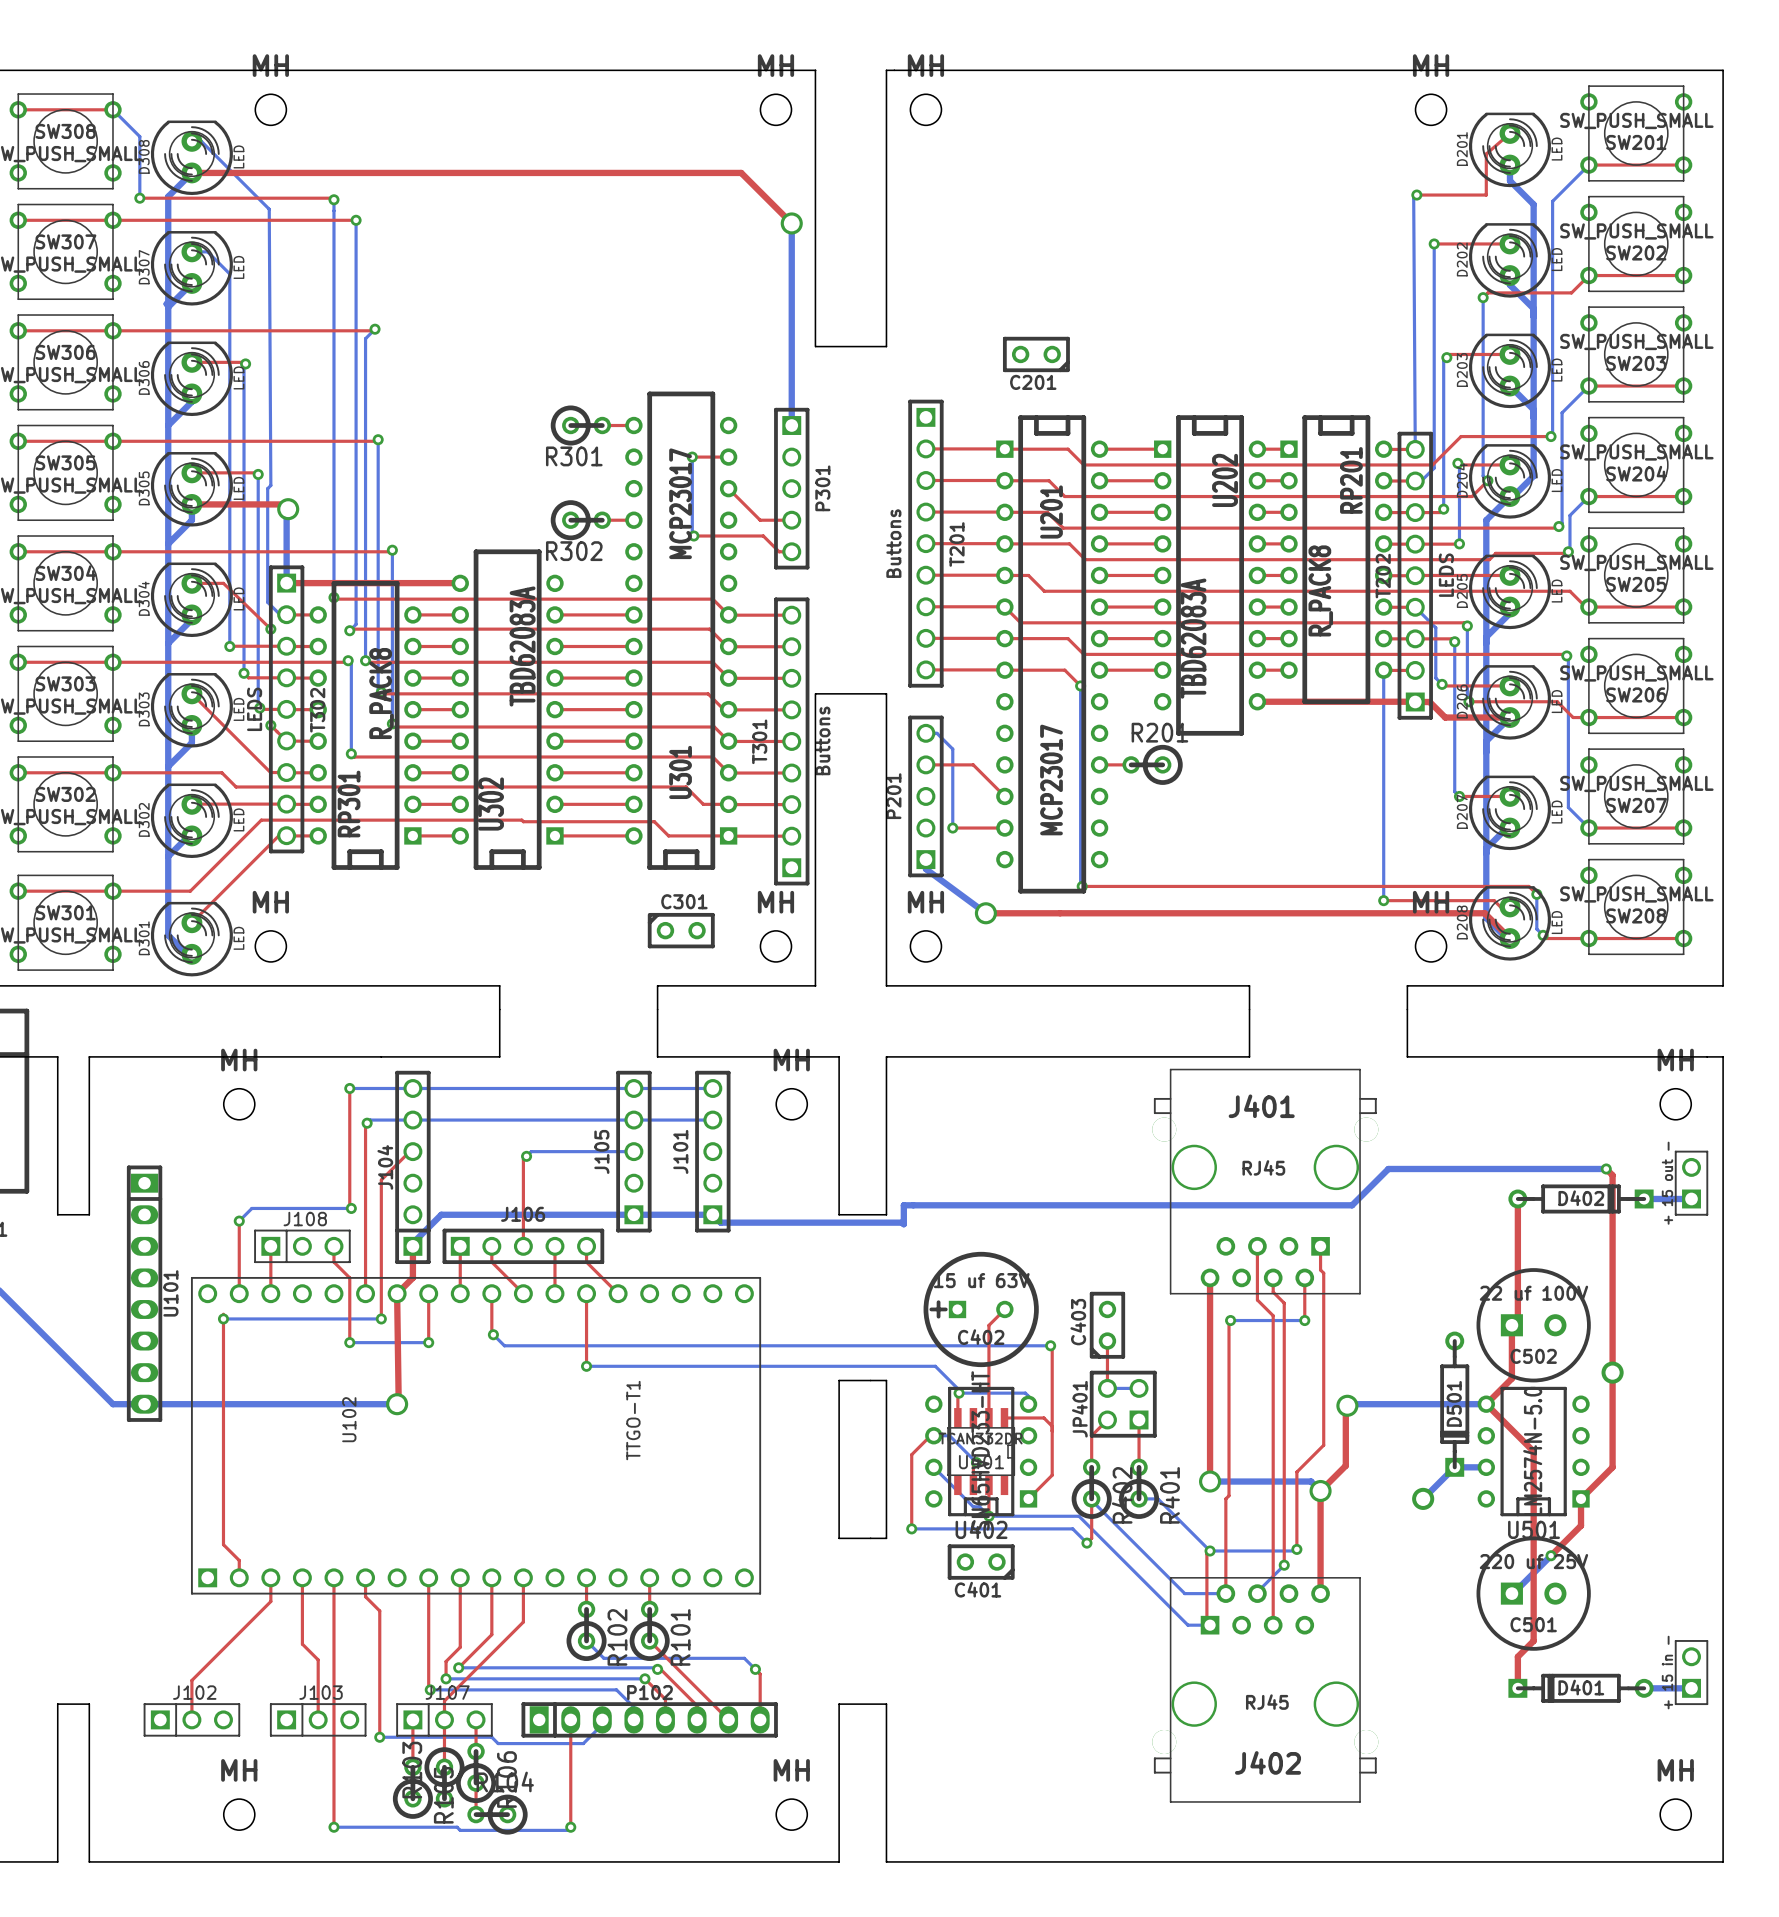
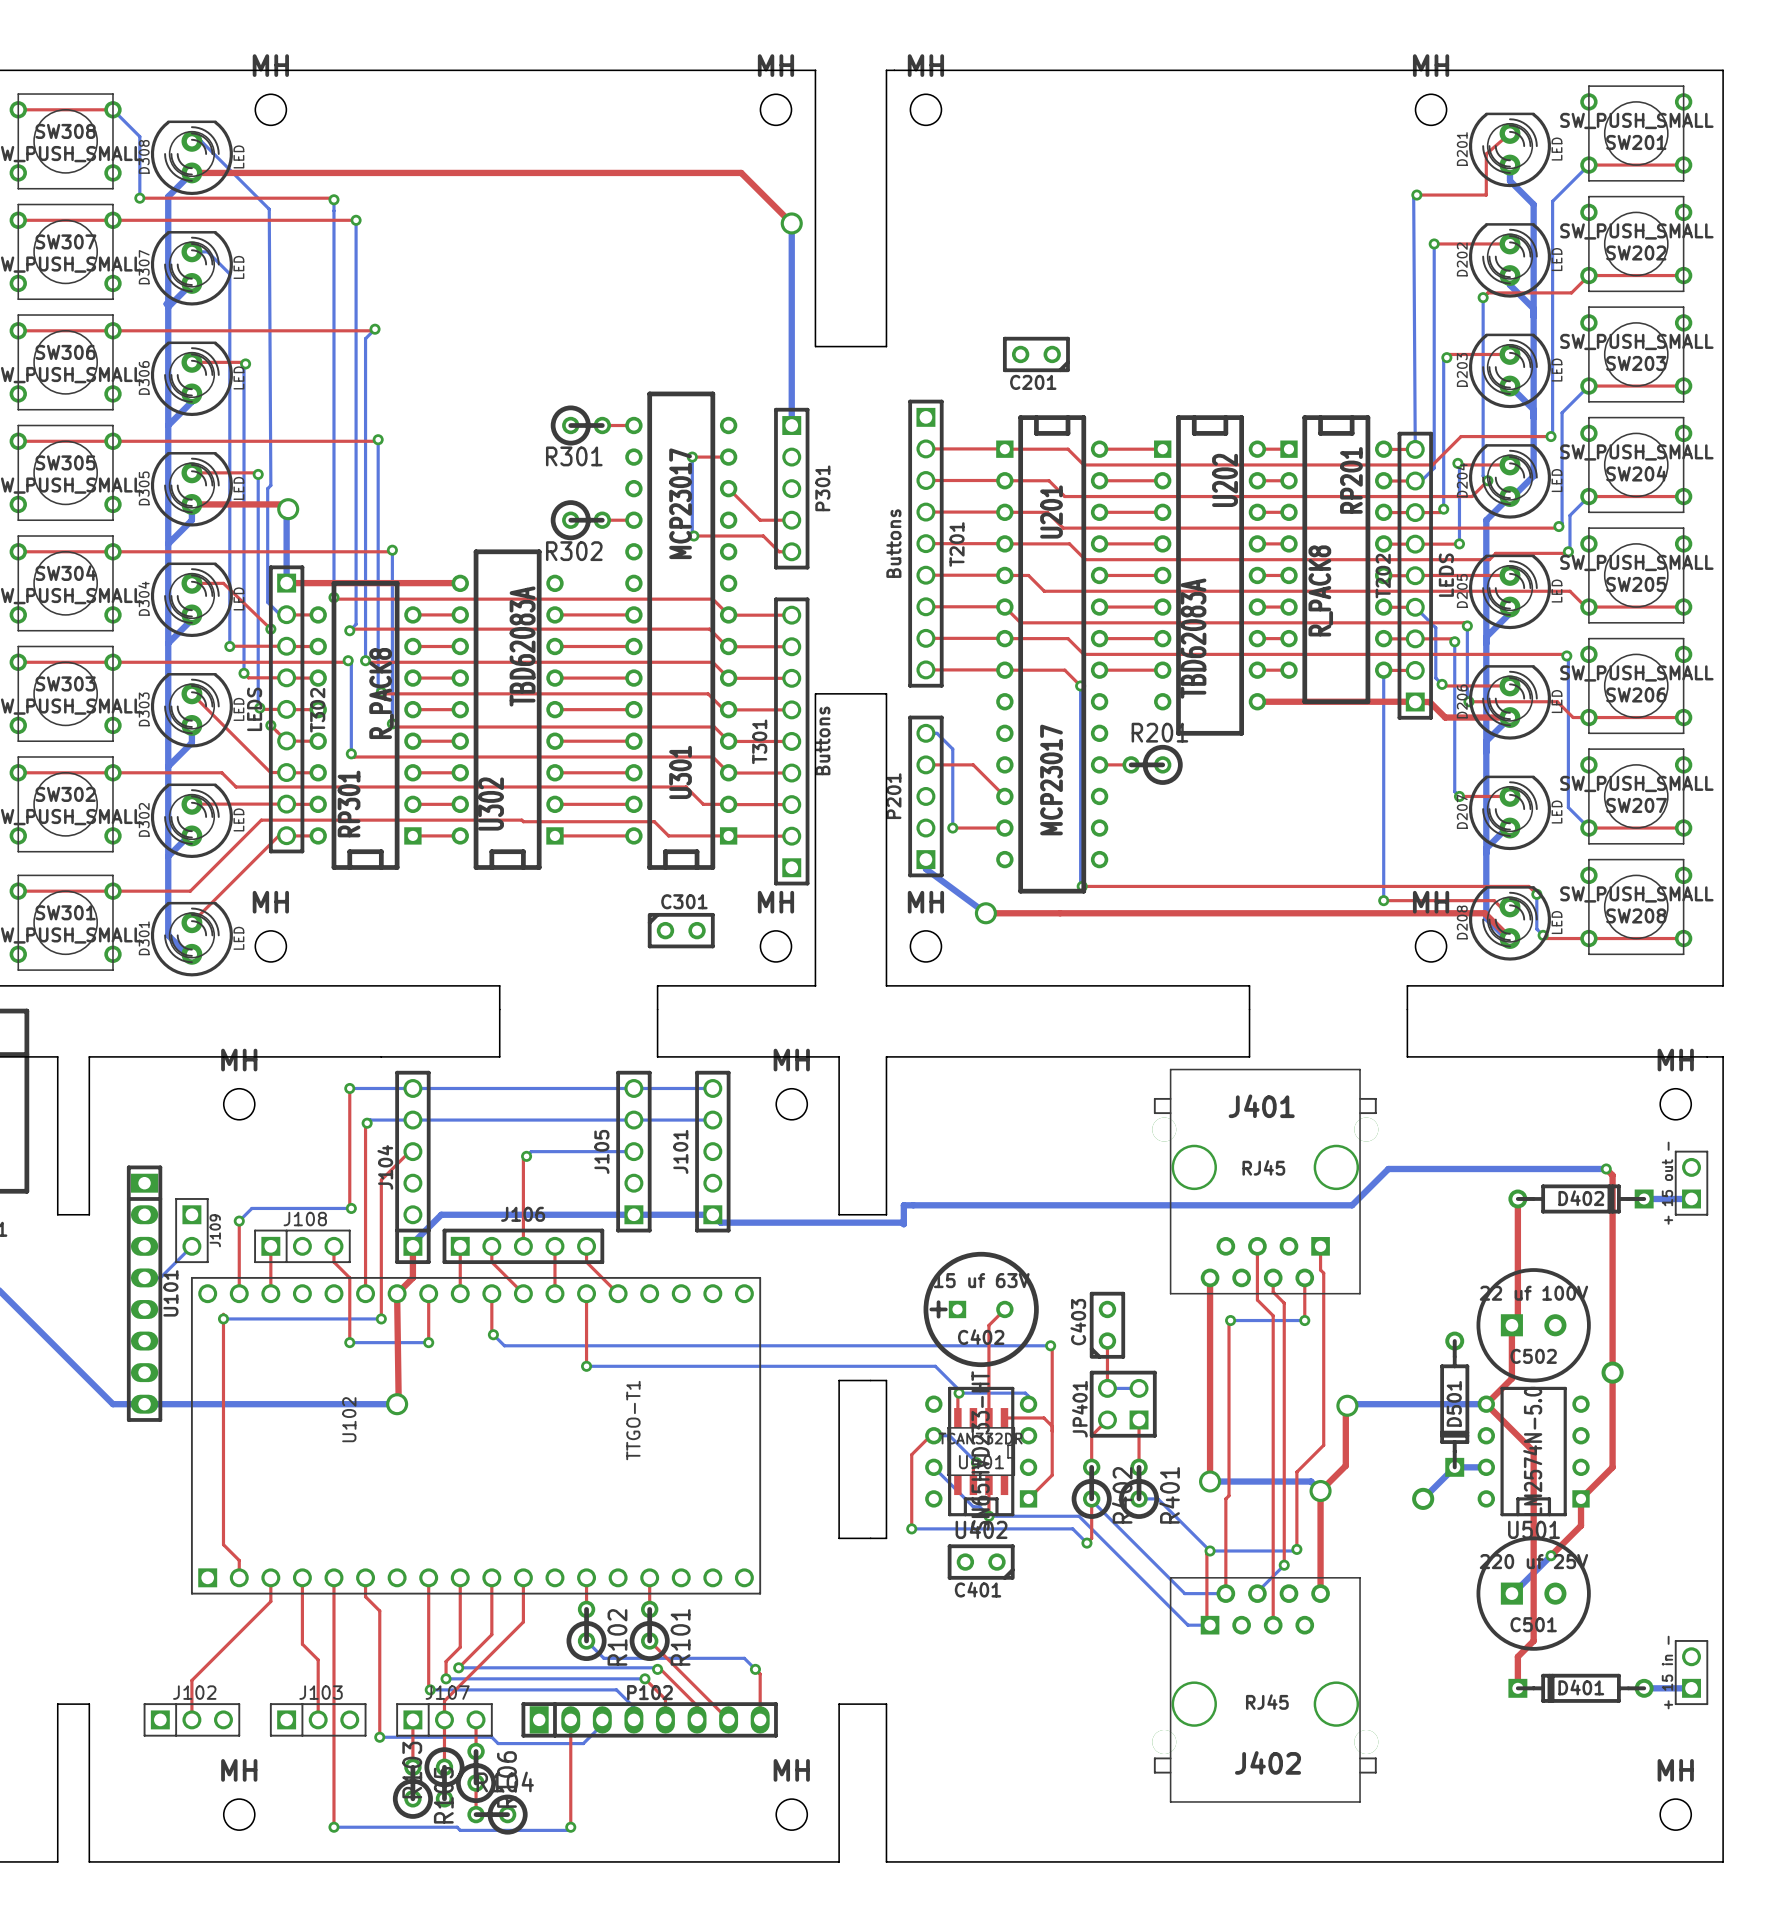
J109: none -> (191, 1230)
bottom track: none -> (191, 1246) (160, 1277) (144, 1277)

